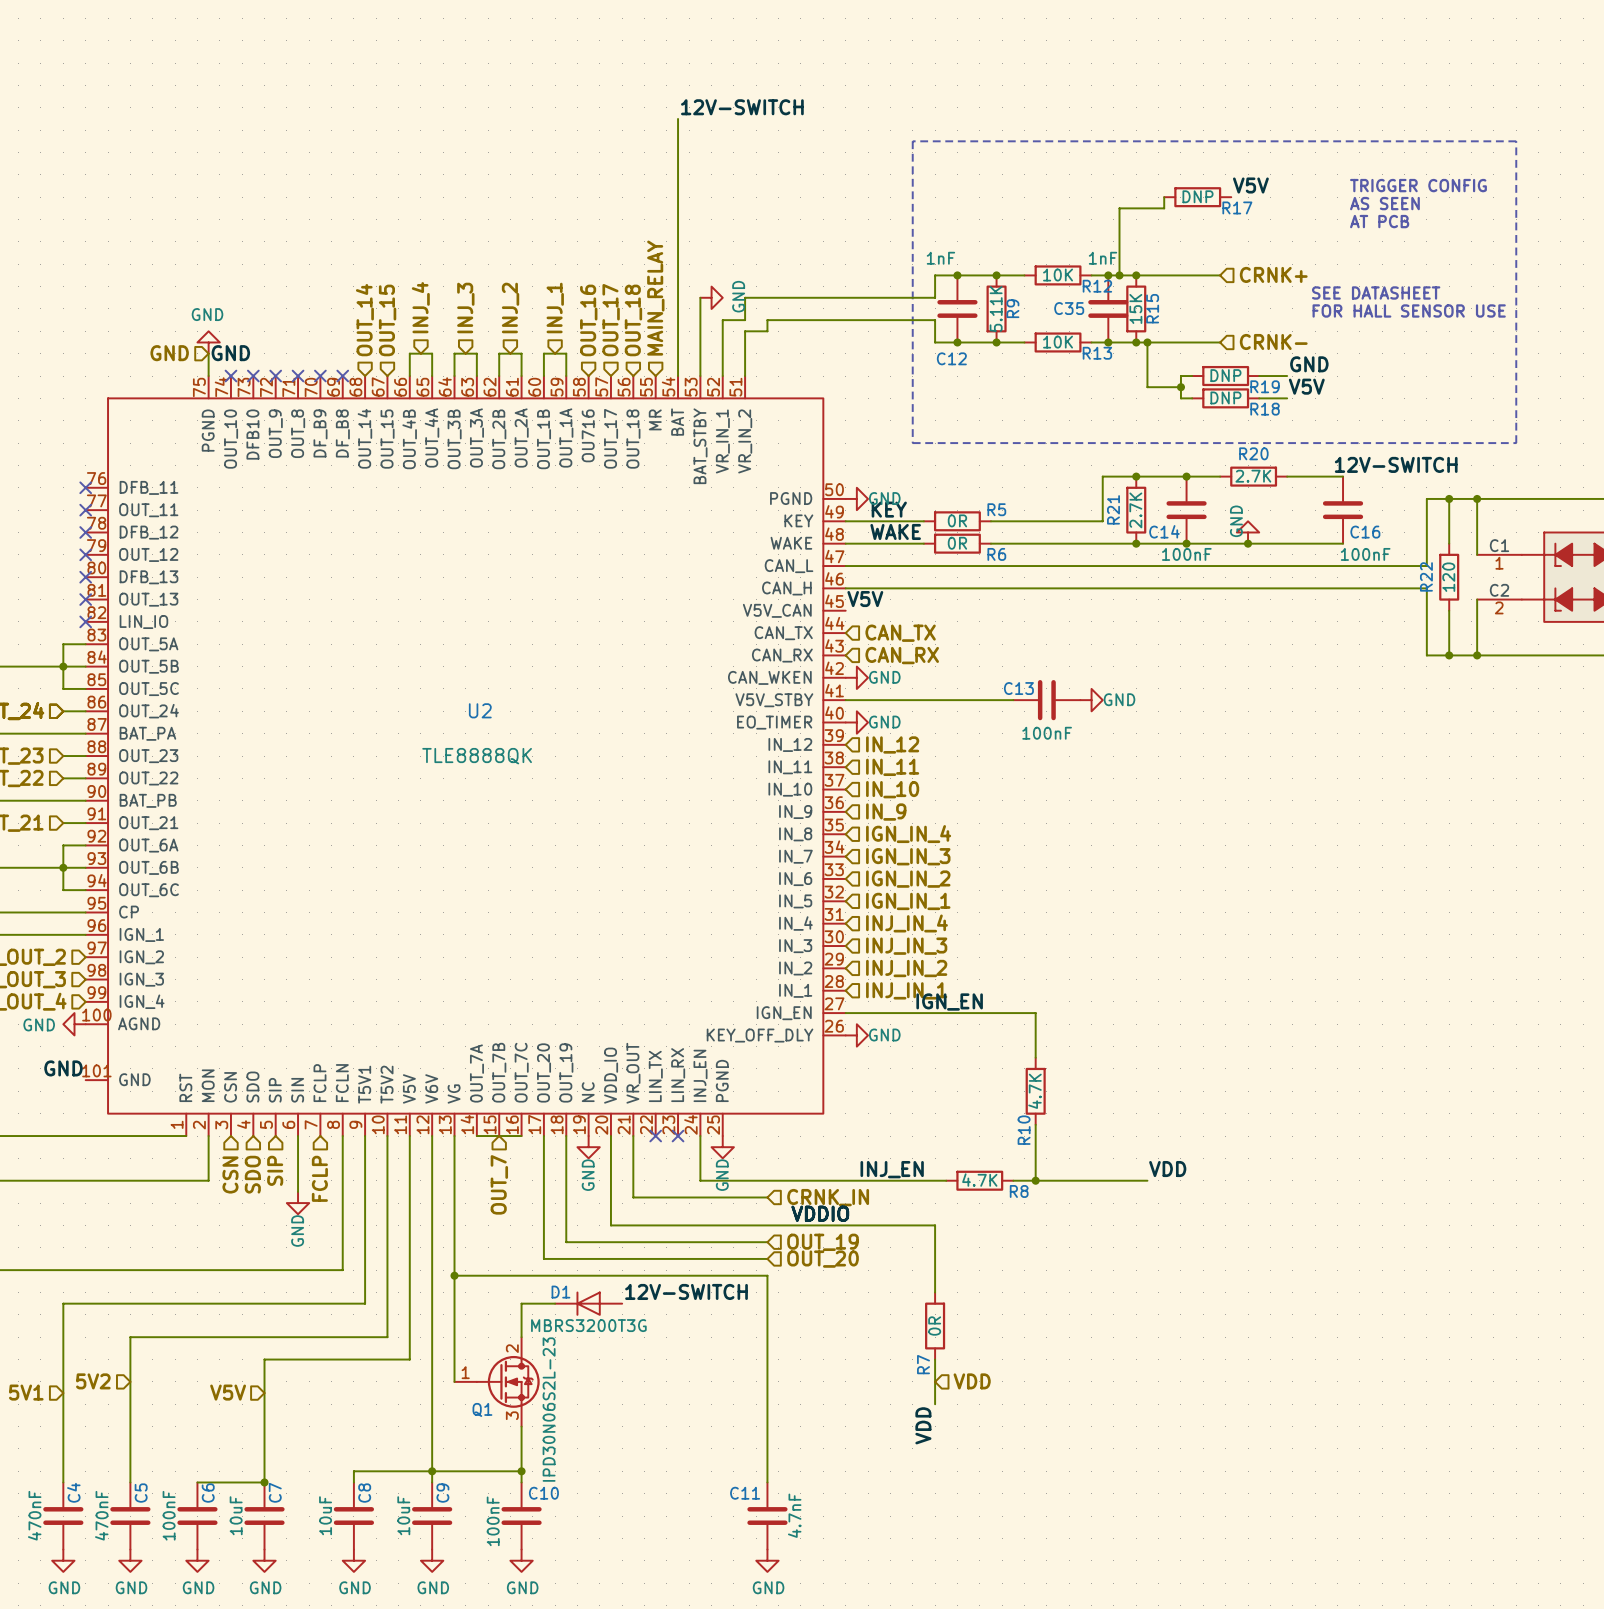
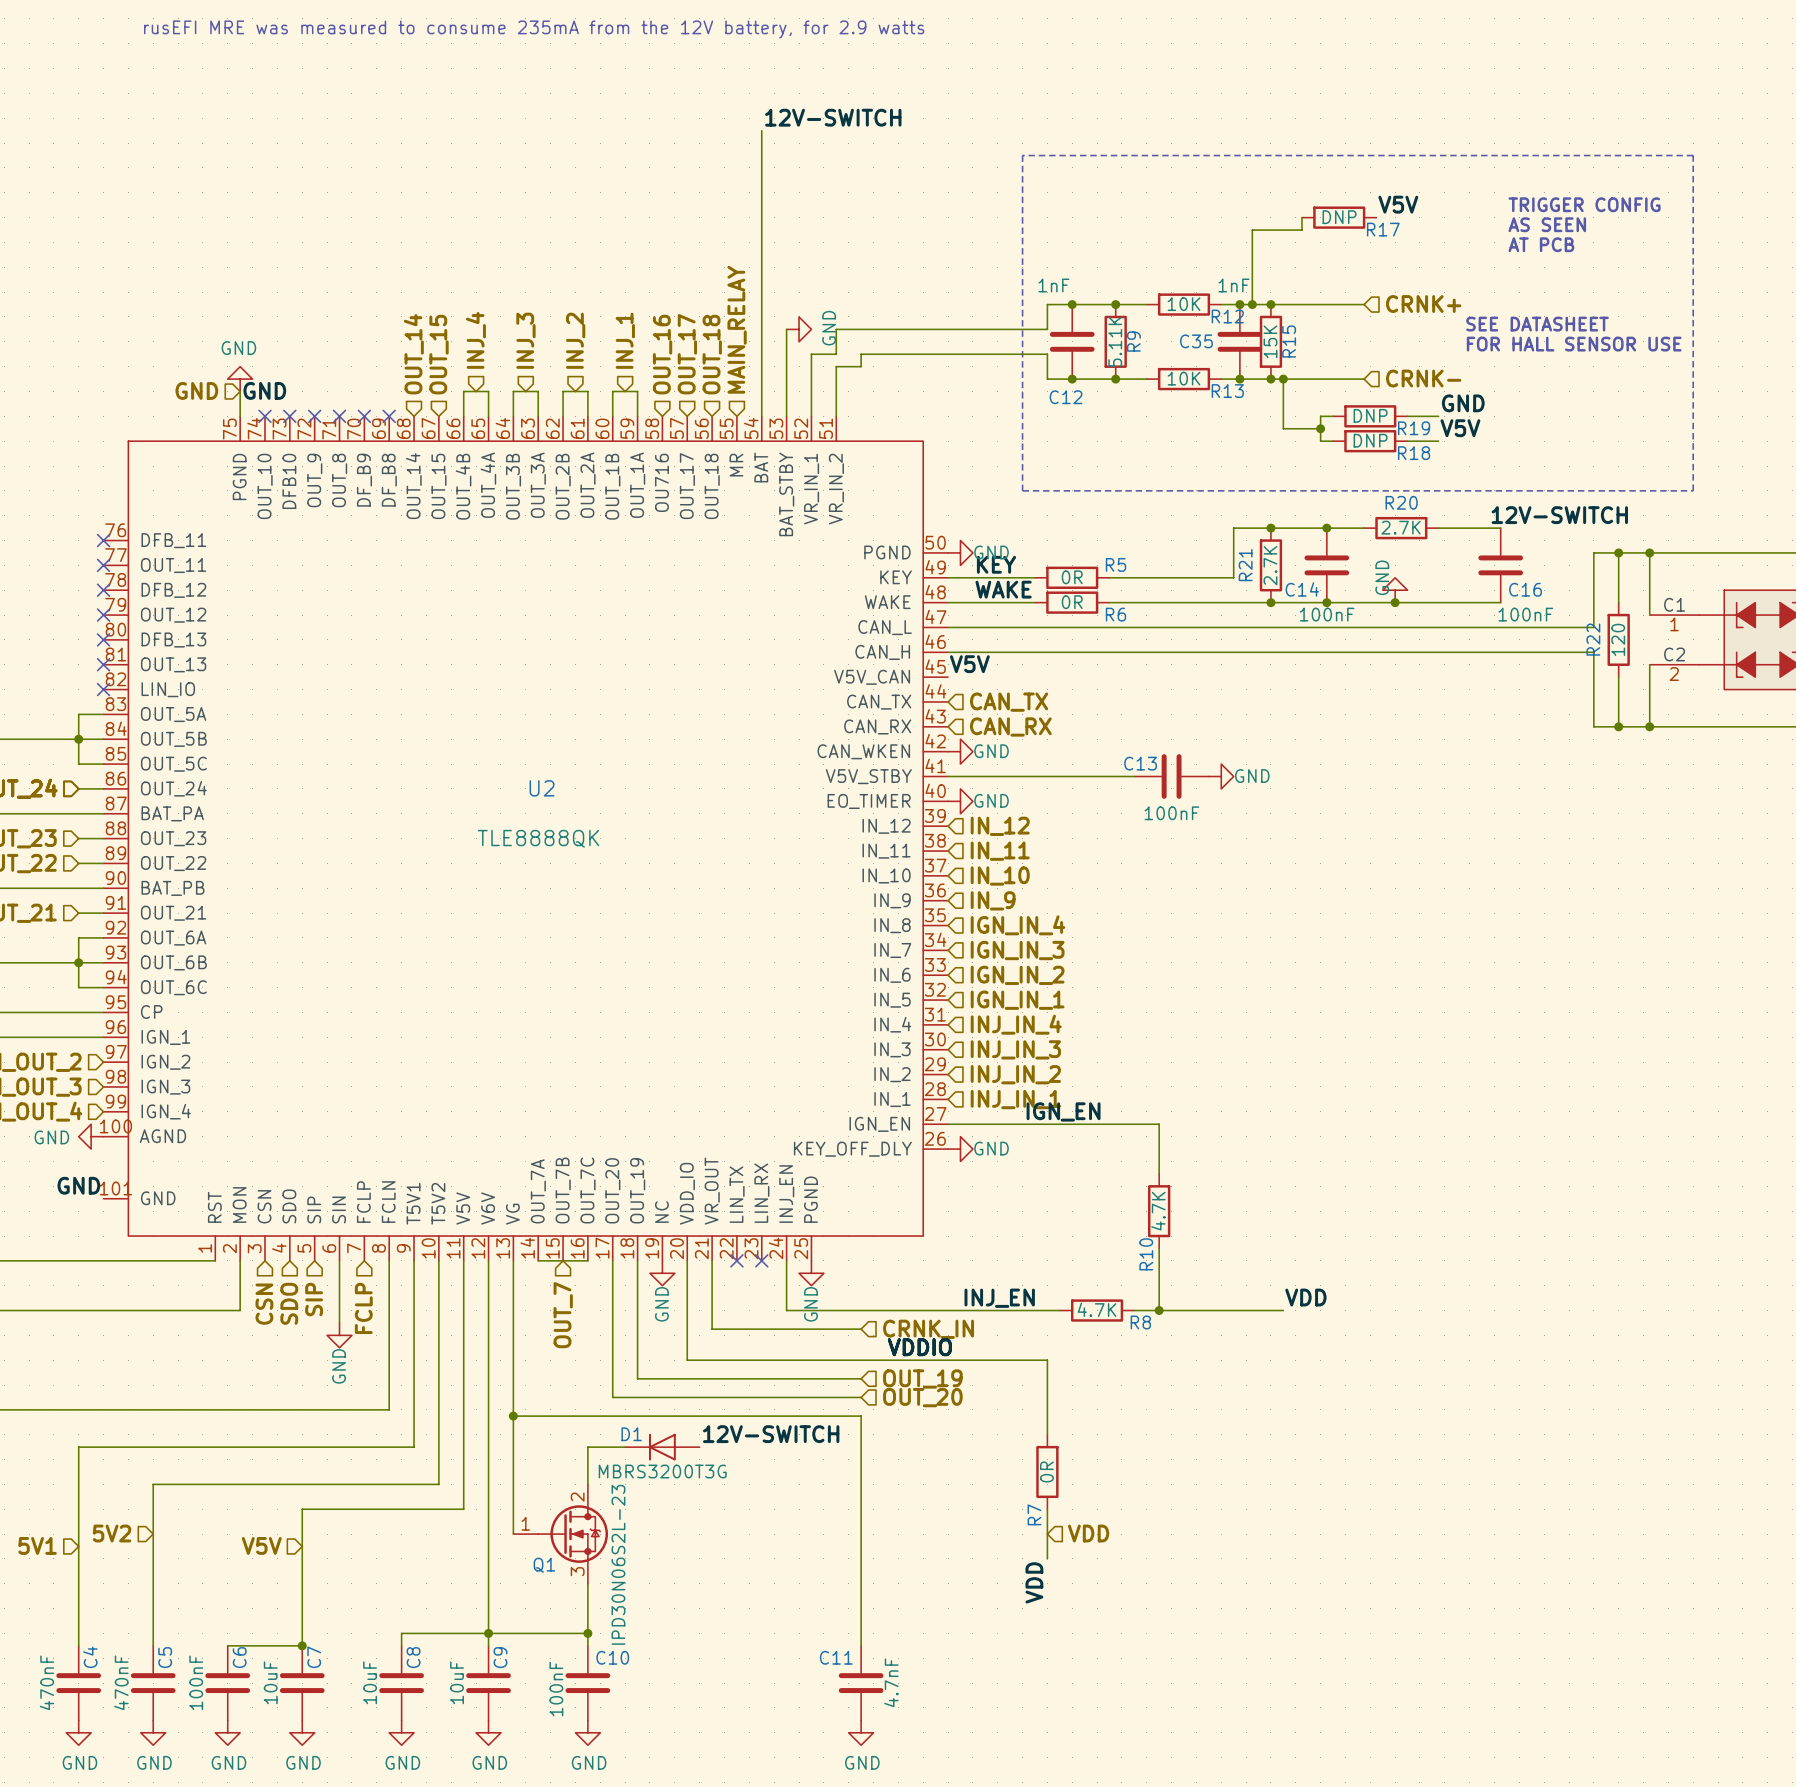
text: none -> rusEFI MRE was measured to consume 235mA from the 12V battery, for 2.9 watts (534, 29)

